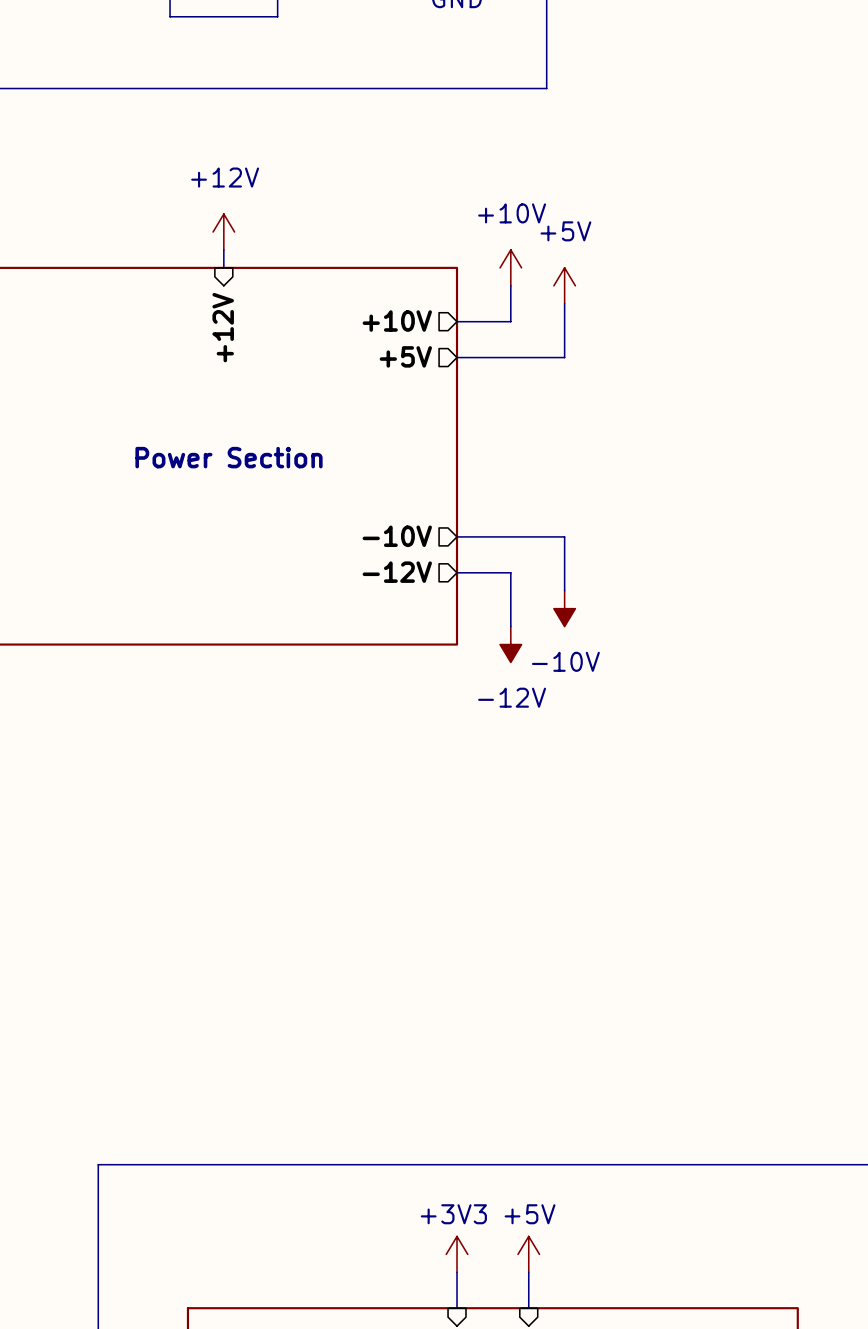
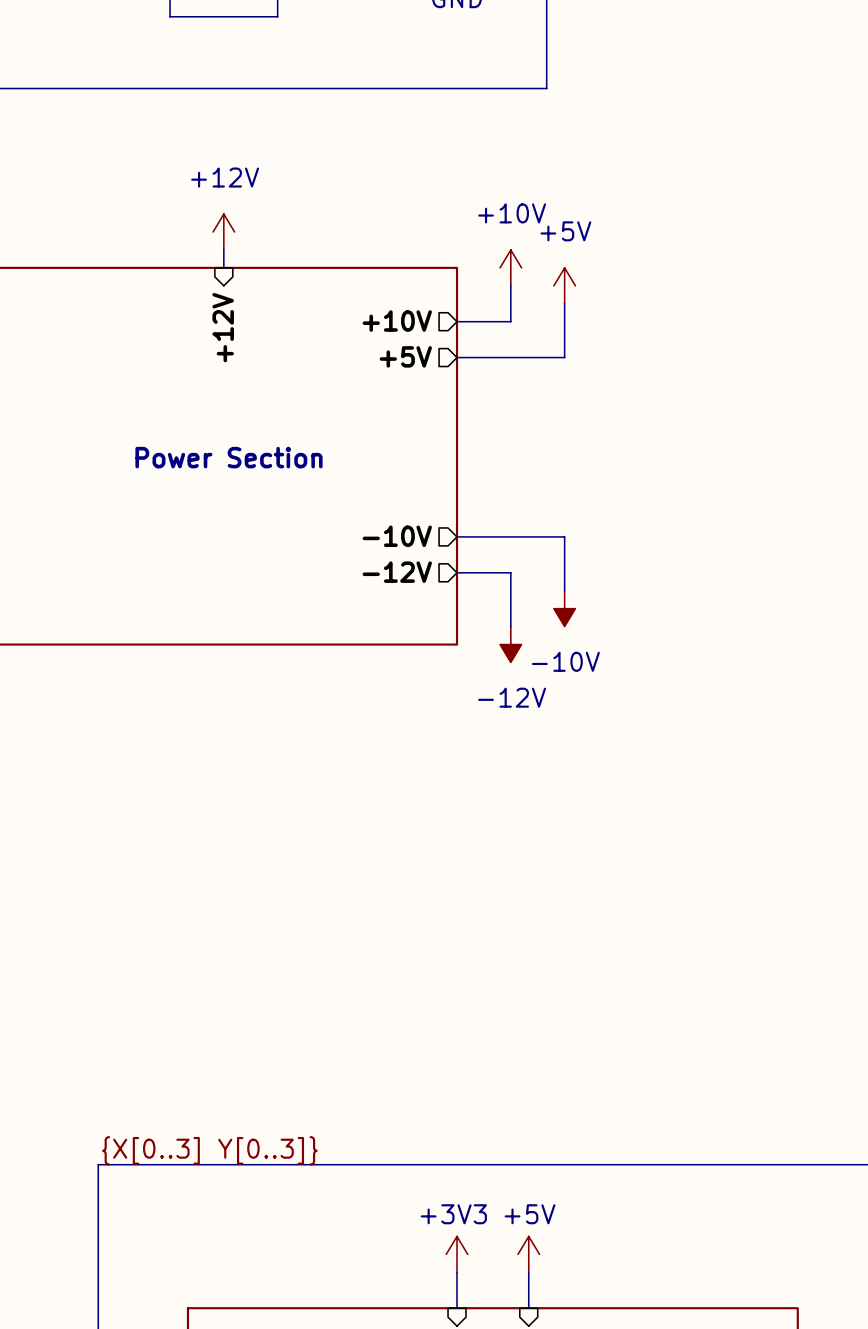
label: none -> {X[0..3] Y[0..3]} (209, 1150)

